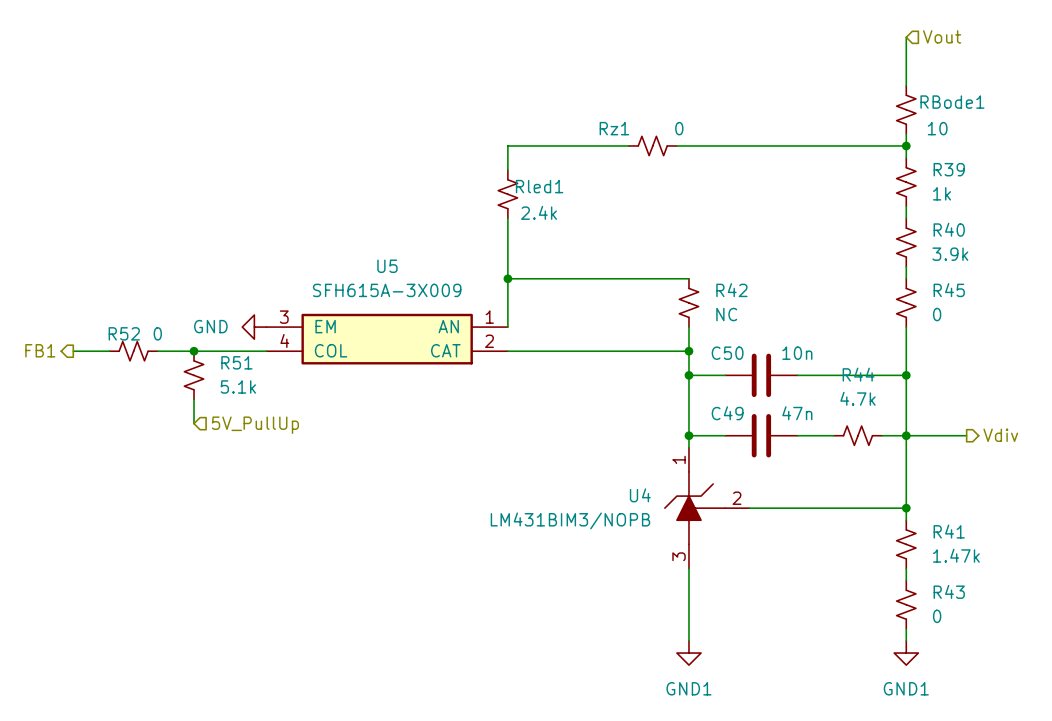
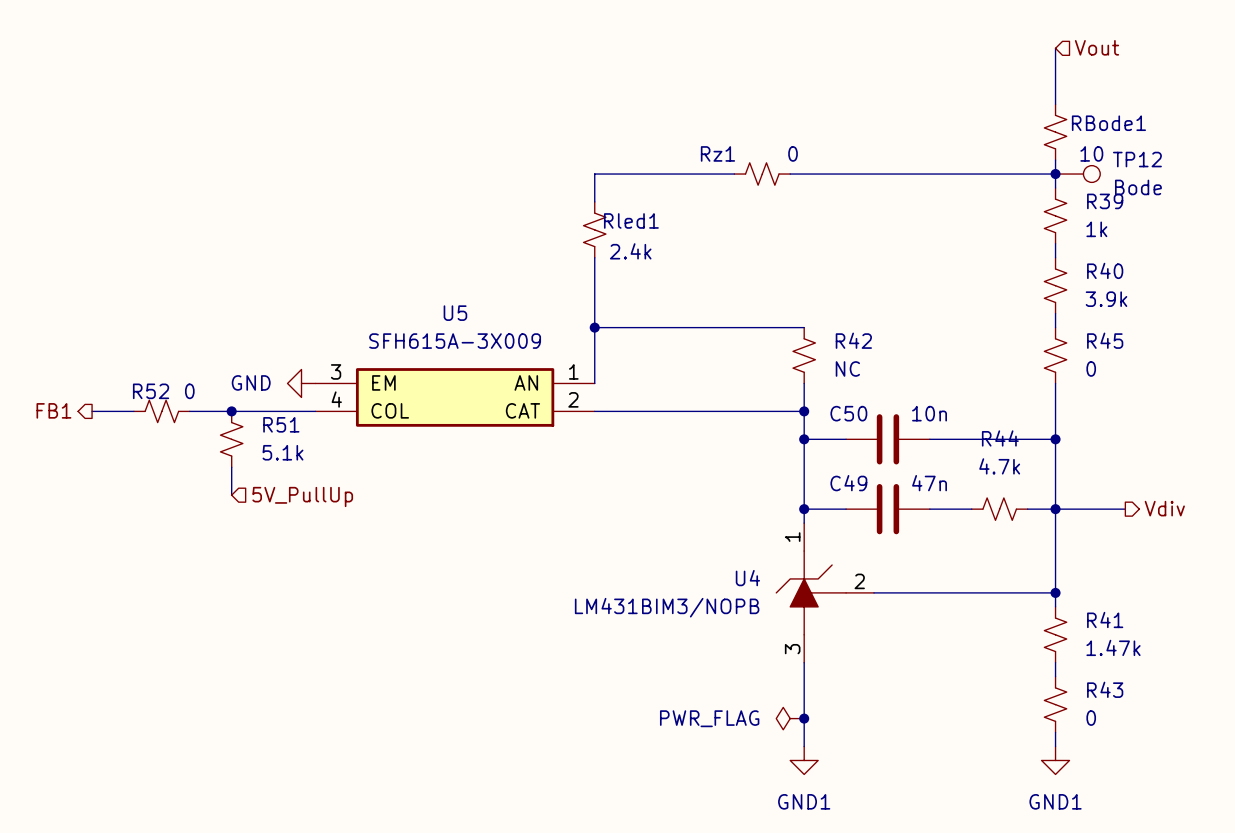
TP12: none -> Bode (1077, 174)
power symbol: none -> PWR_FLAG (790, 718)
junction: none -> (804, 718)

